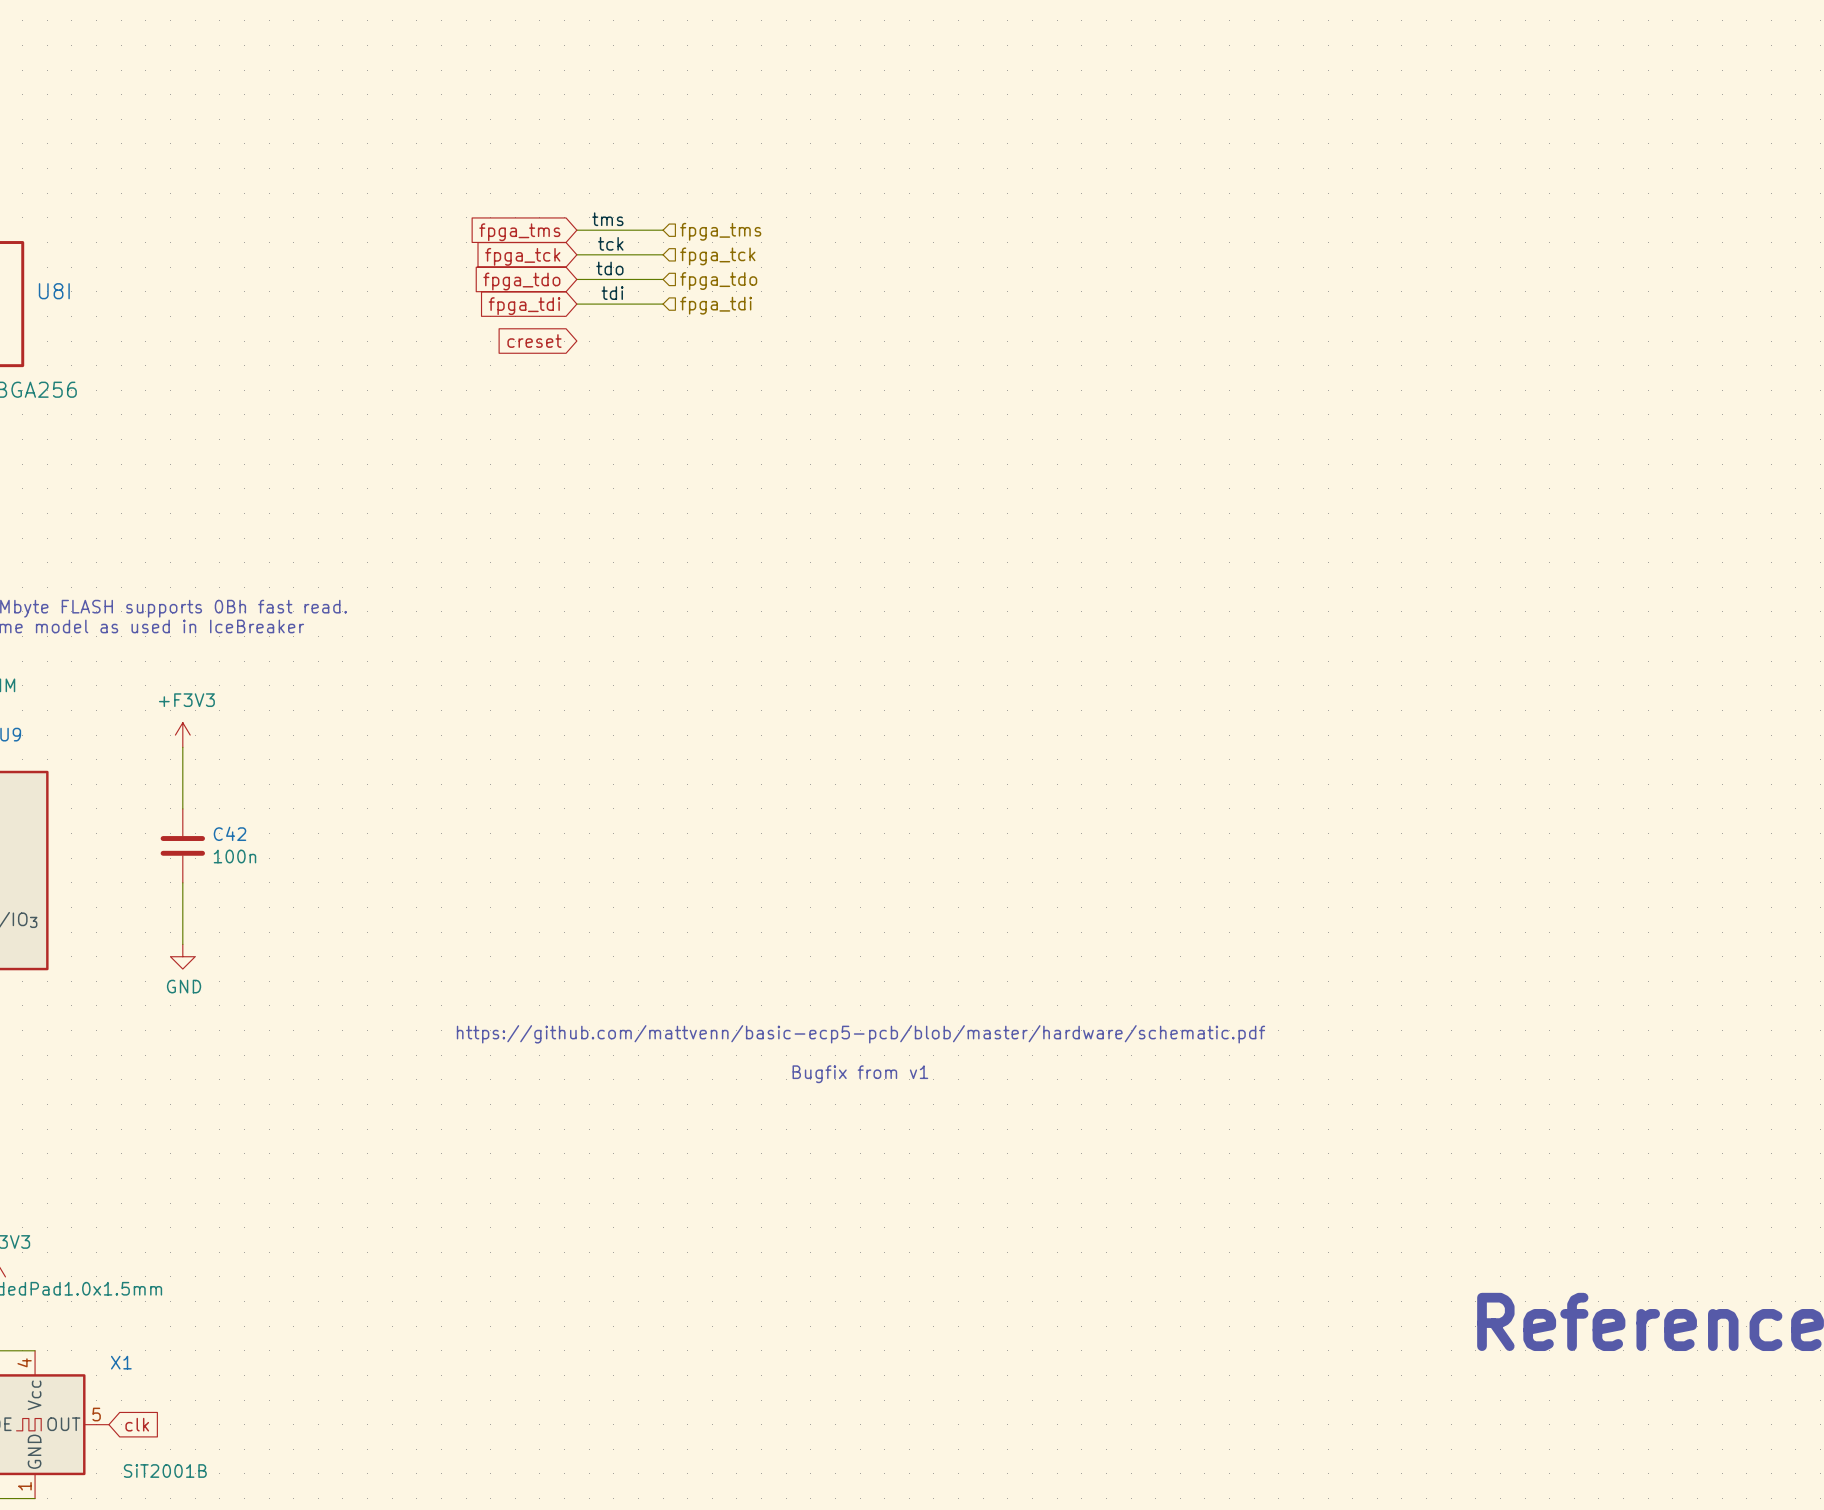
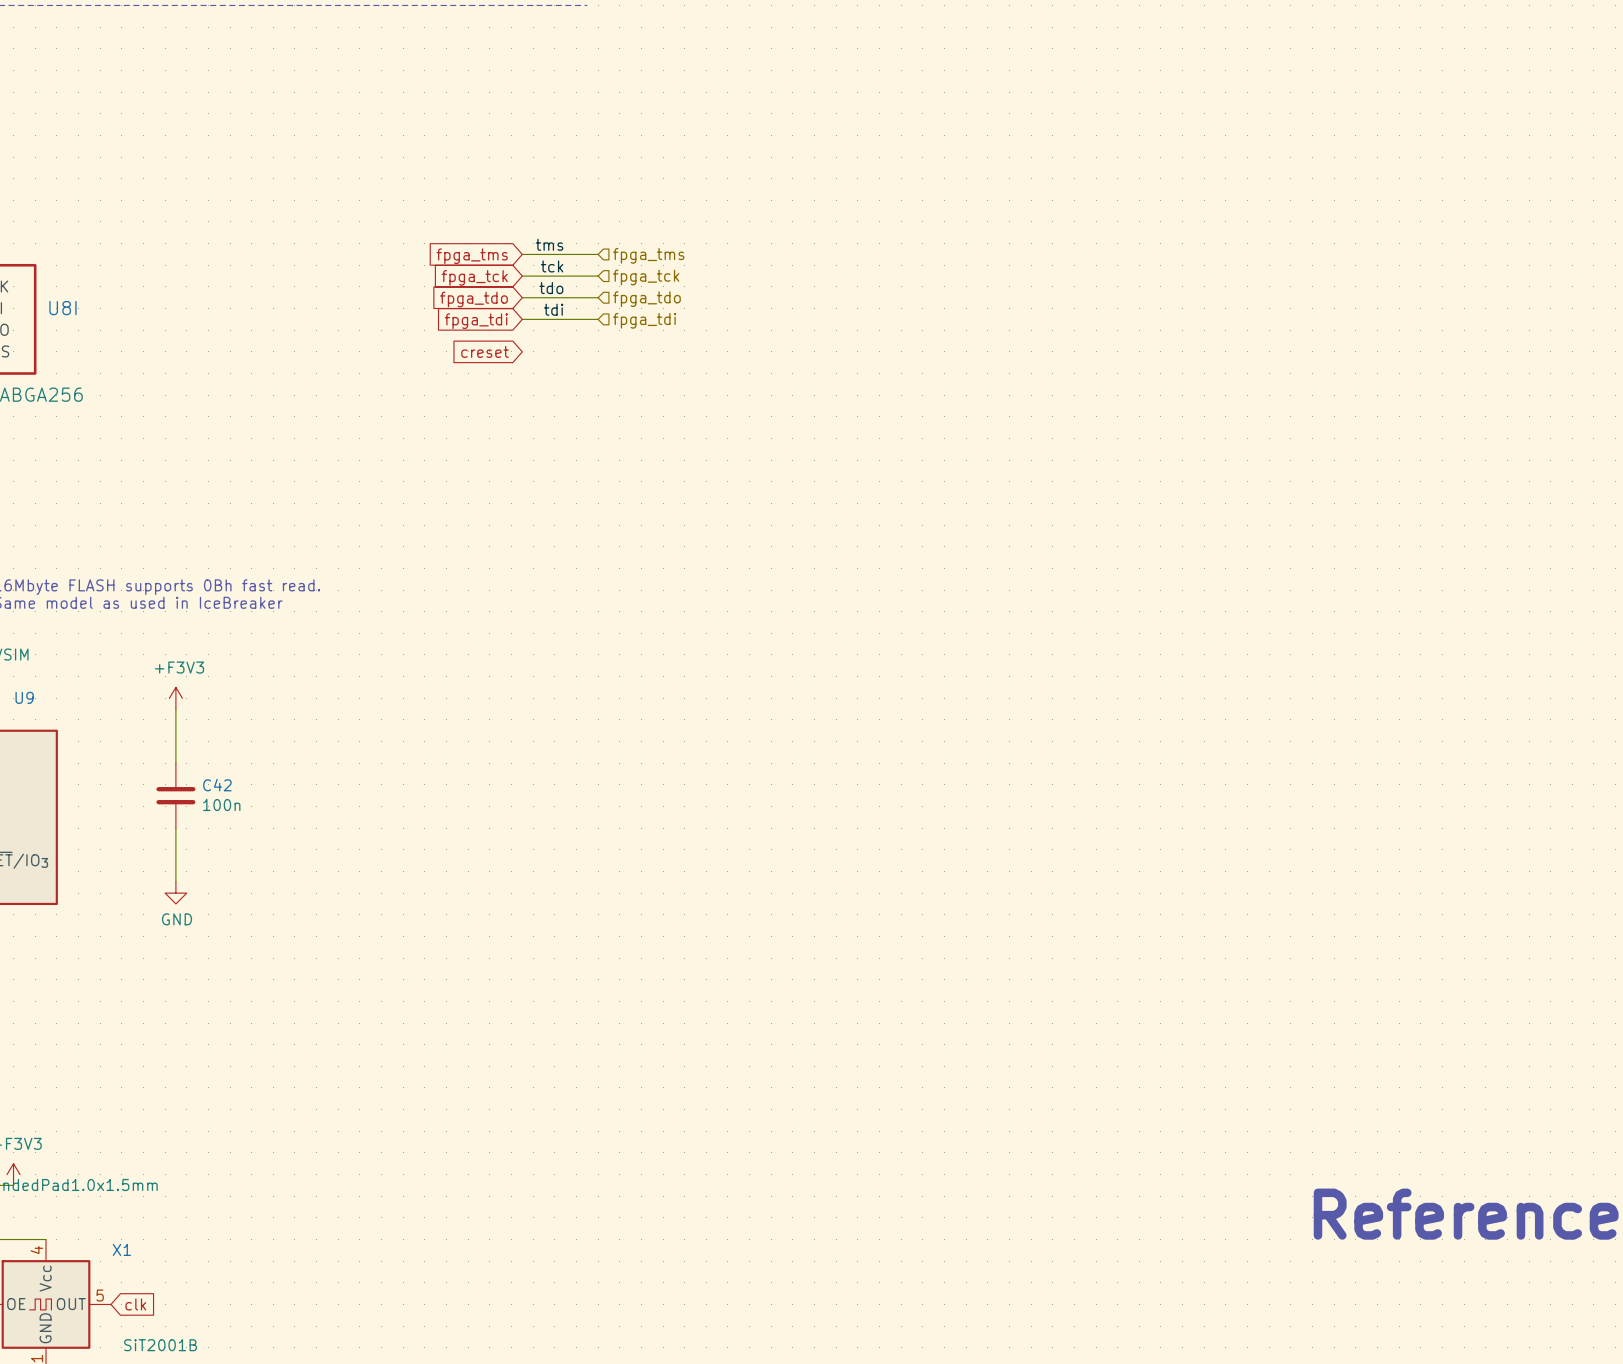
text: https://github.com/mattvenn/basic-ecp5-pcb/blob/master/hardware/schematic.pdf (860, 1034) -> none
text: Bugfix from v1 (860, 1074) -> none

